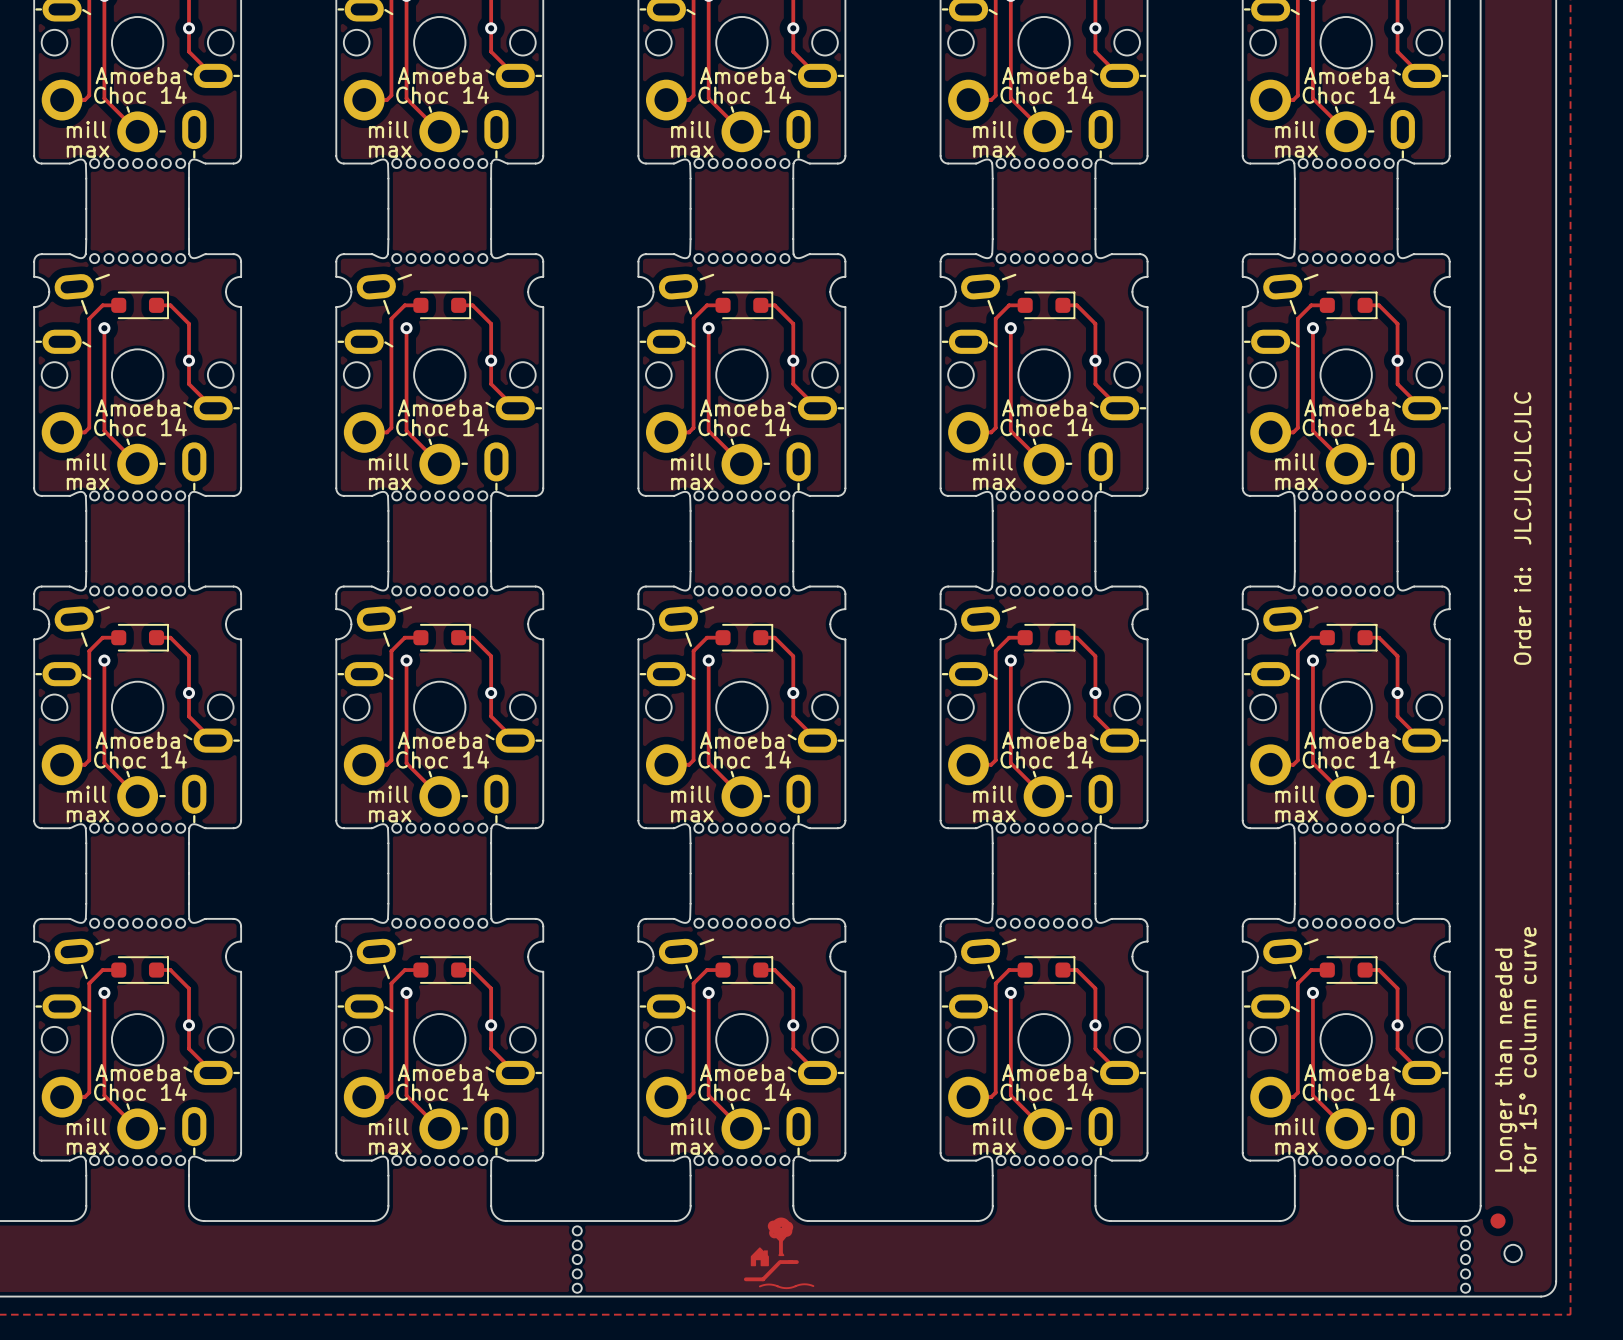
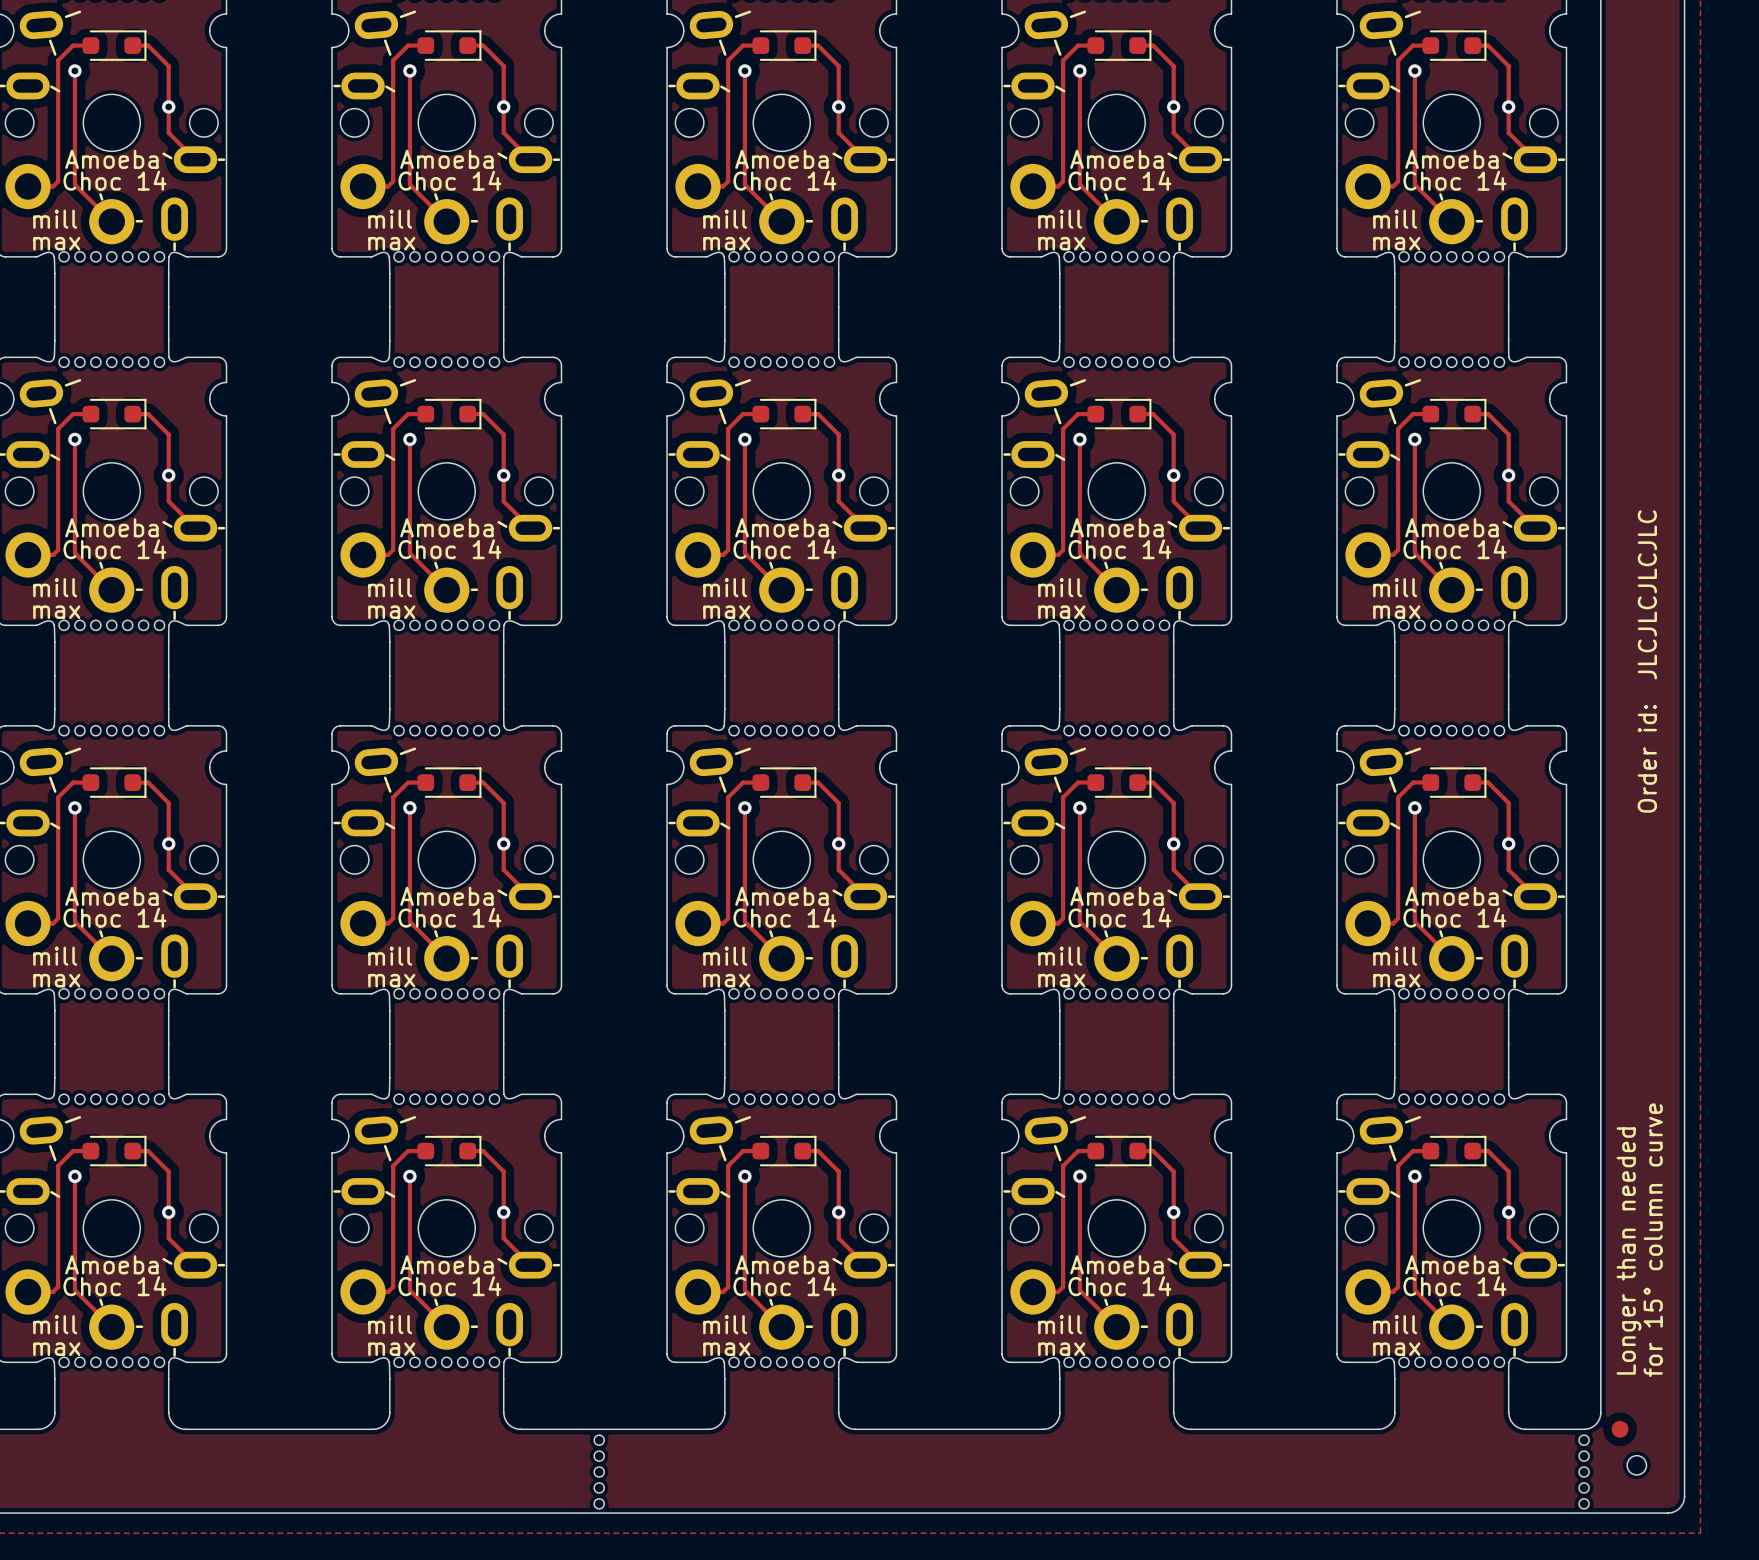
part: (780, 1236) -> none
part: (759, 1256) -> none
part: (771, 1270) -> none
part: (786, 1286) -> none

